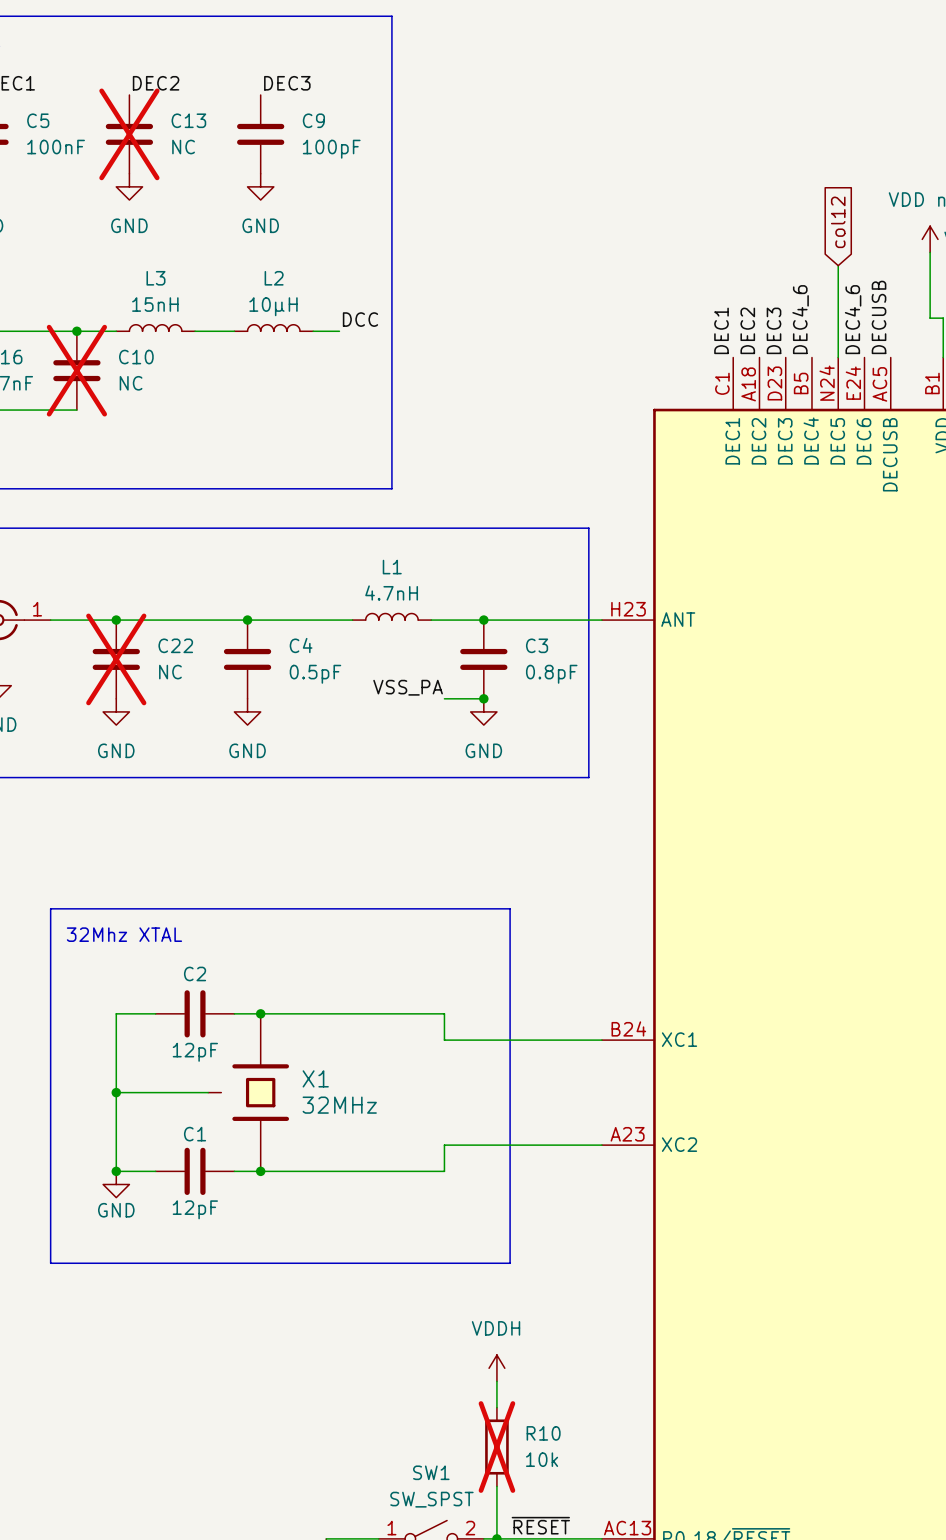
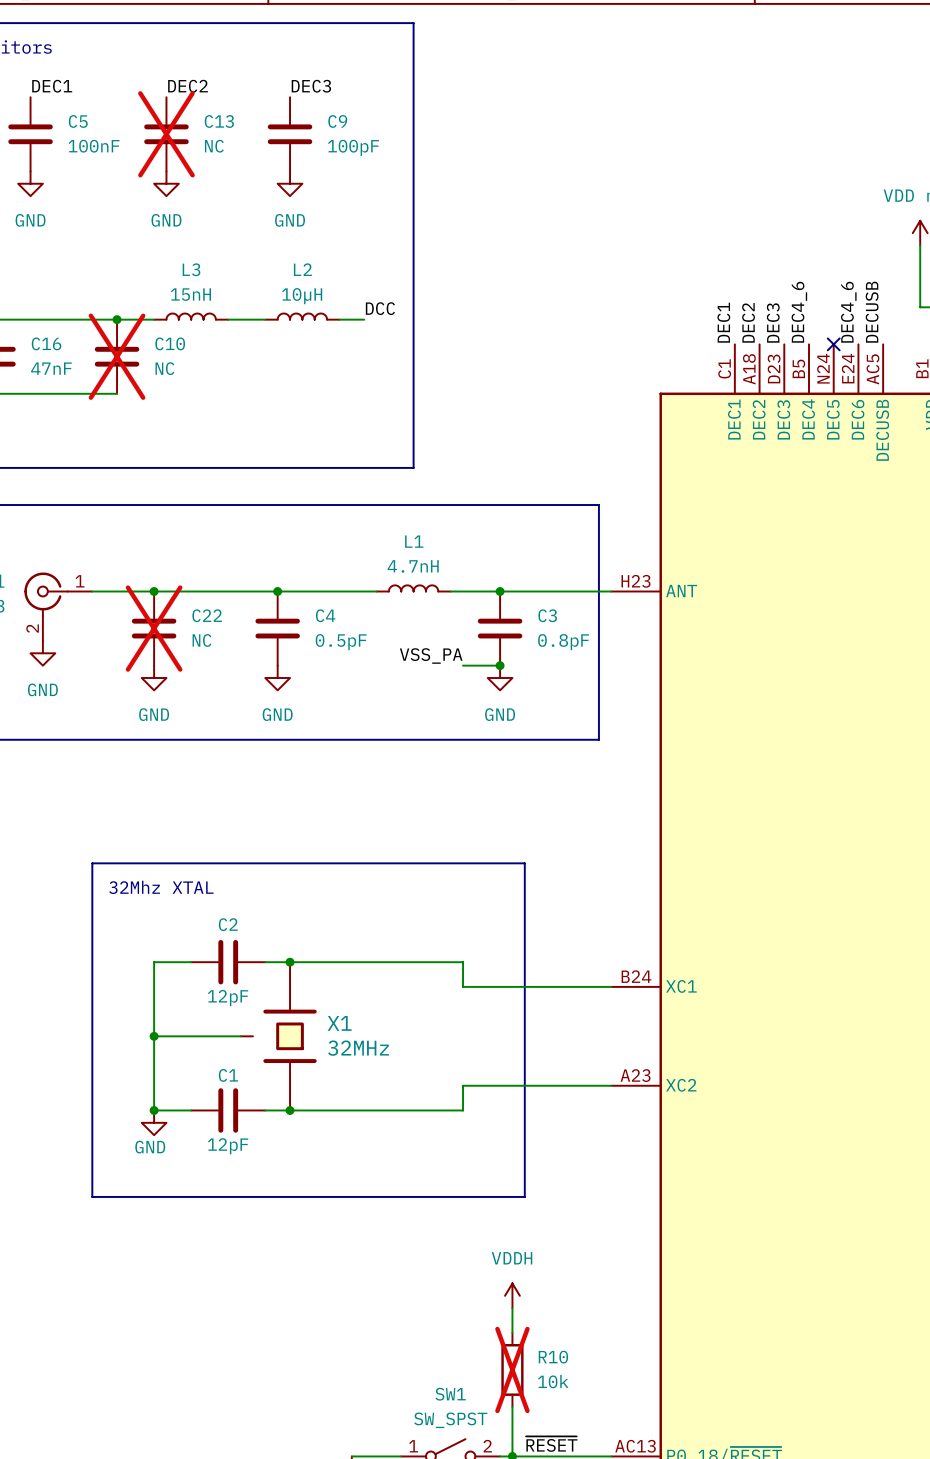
global label: col12 (838, 222) -> none
wire: (838, 265) (838, 357) -> none
no-connect mark: none -> (833, 344)

